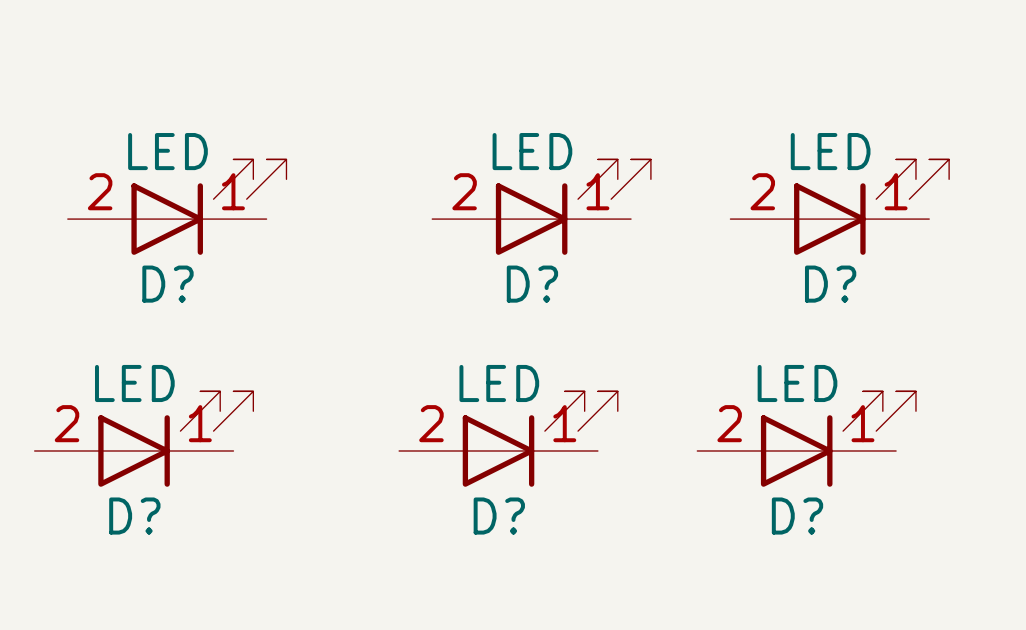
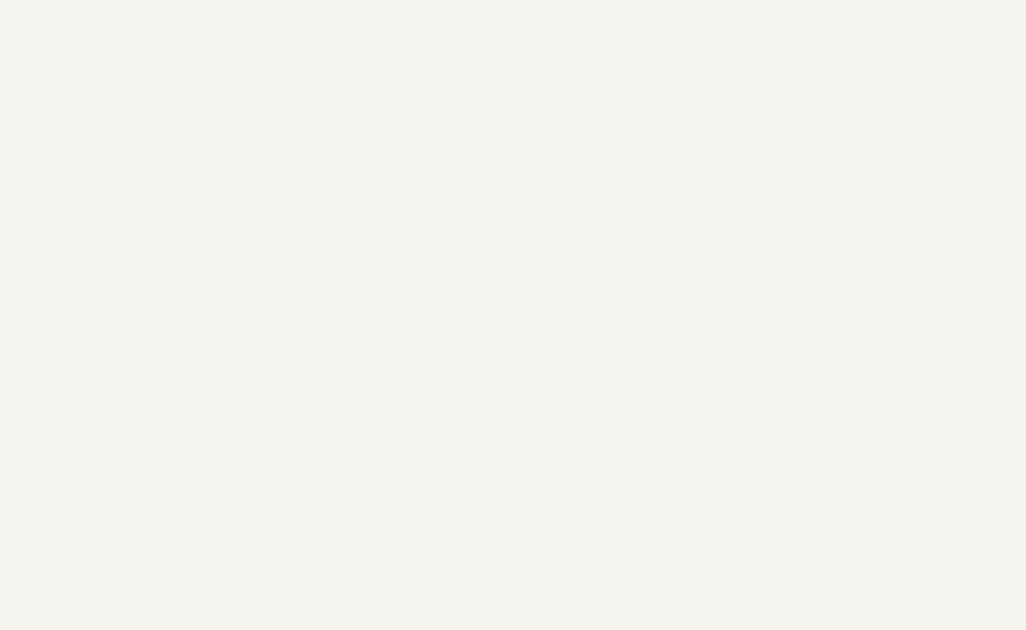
D?: LED (177, 207) -> none
D?: LED (541, 207) -> none
D?: LED (839, 207) -> none
D?: LED (143, 439) -> none
D?: LED (508, 439) -> none
D?: LED (806, 439) -> none

